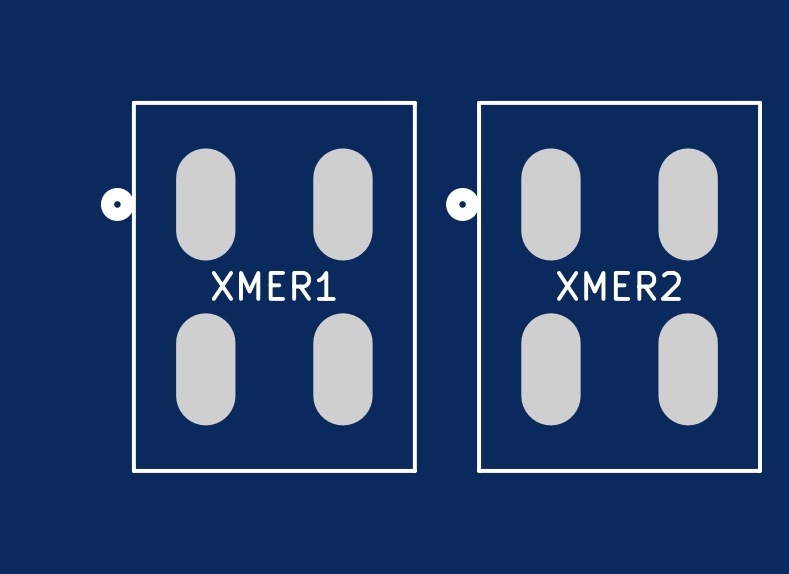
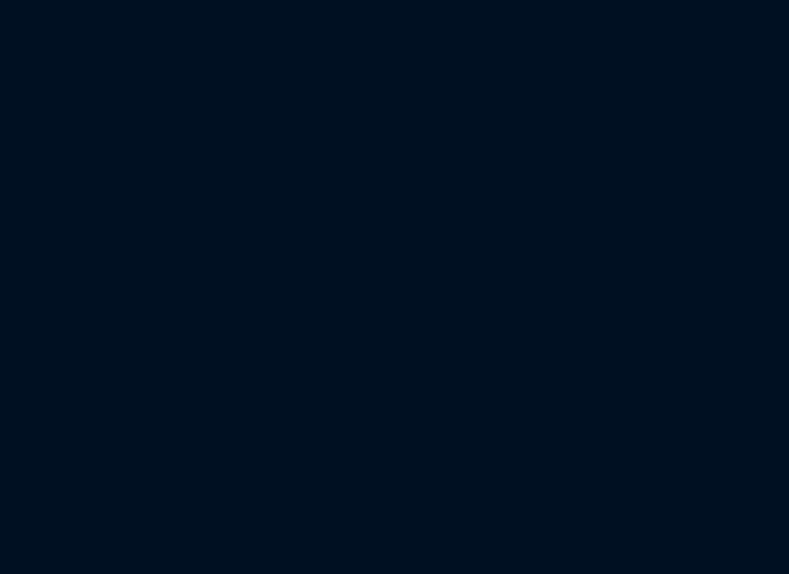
XMER1: (258, 286) -> none
XMER2: (604, 286) -> none

